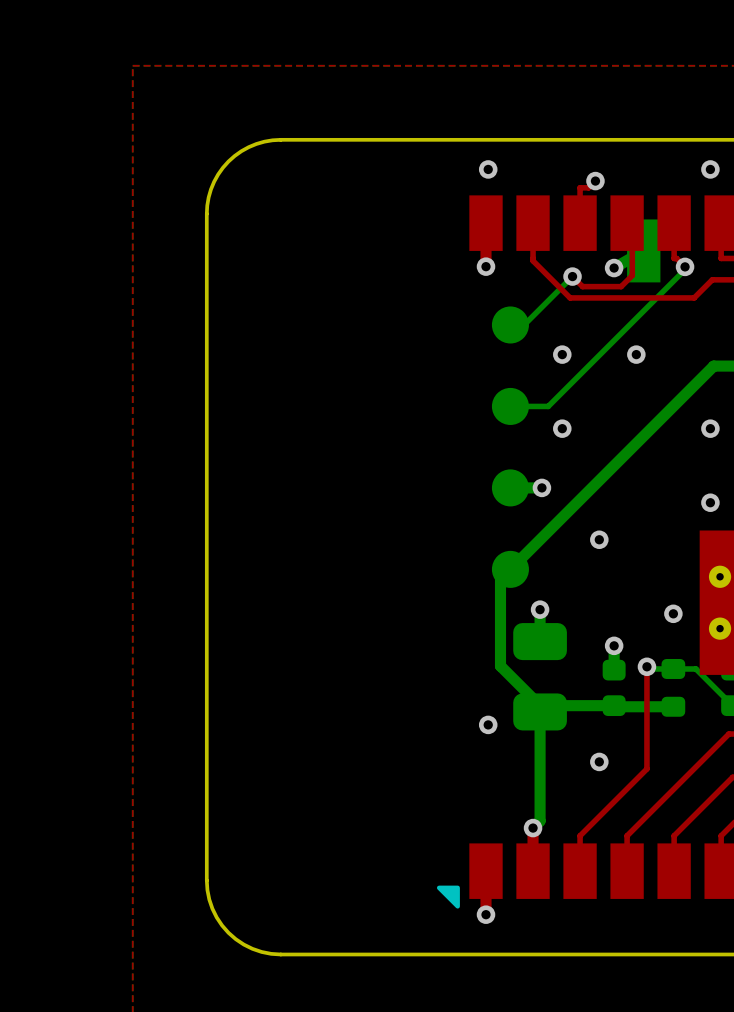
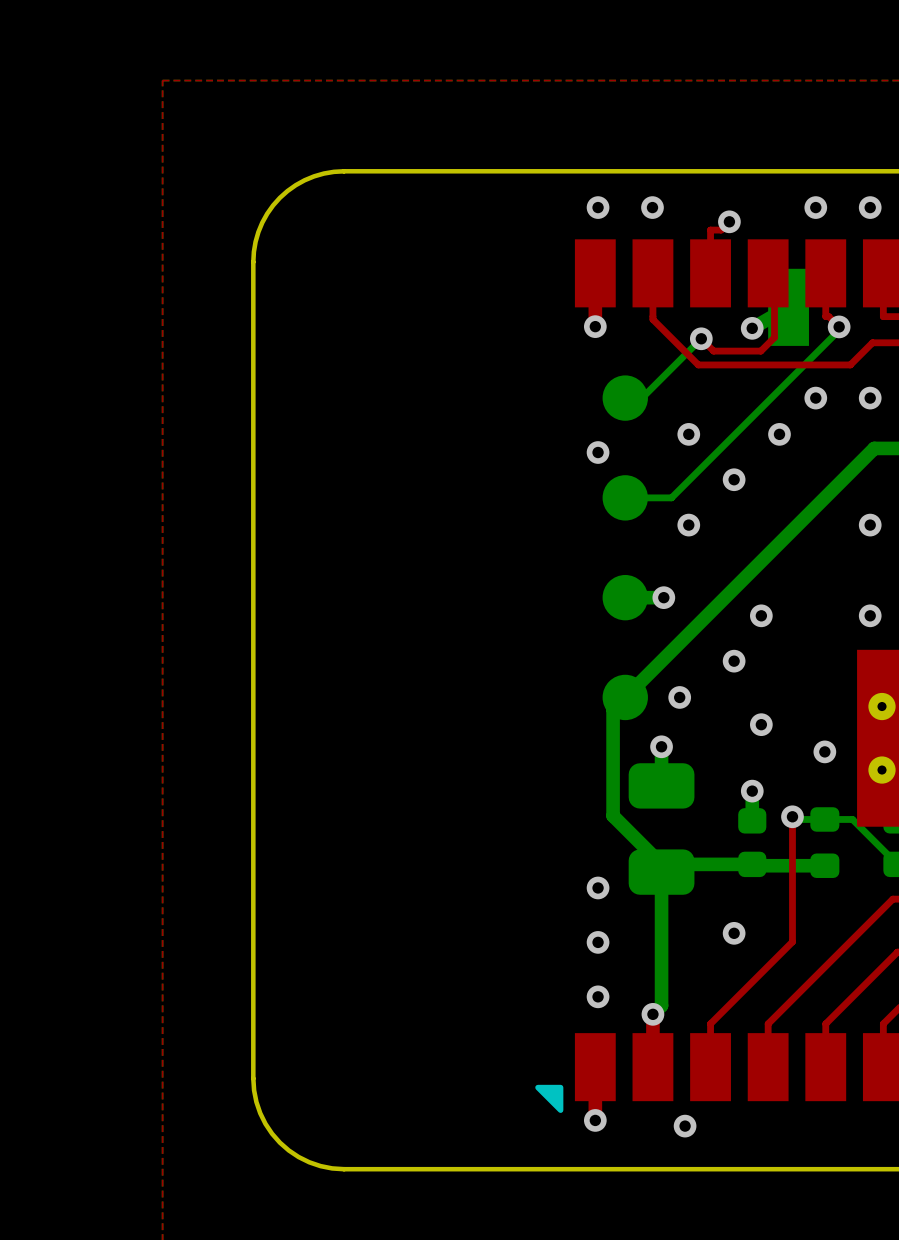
via: none -> (652, 207)
via: none -> (815, 207)
via: none -> (815, 398)
via: none -> (870, 398)
via: none -> (598, 452)
via: none -> (734, 479)
via: none -> (761, 615)
via: none -> (679, 697)
via: none -> (761, 724)
via: none -> (598, 942)
via: none -> (598, 996)
via: none -> (685, 1126)

